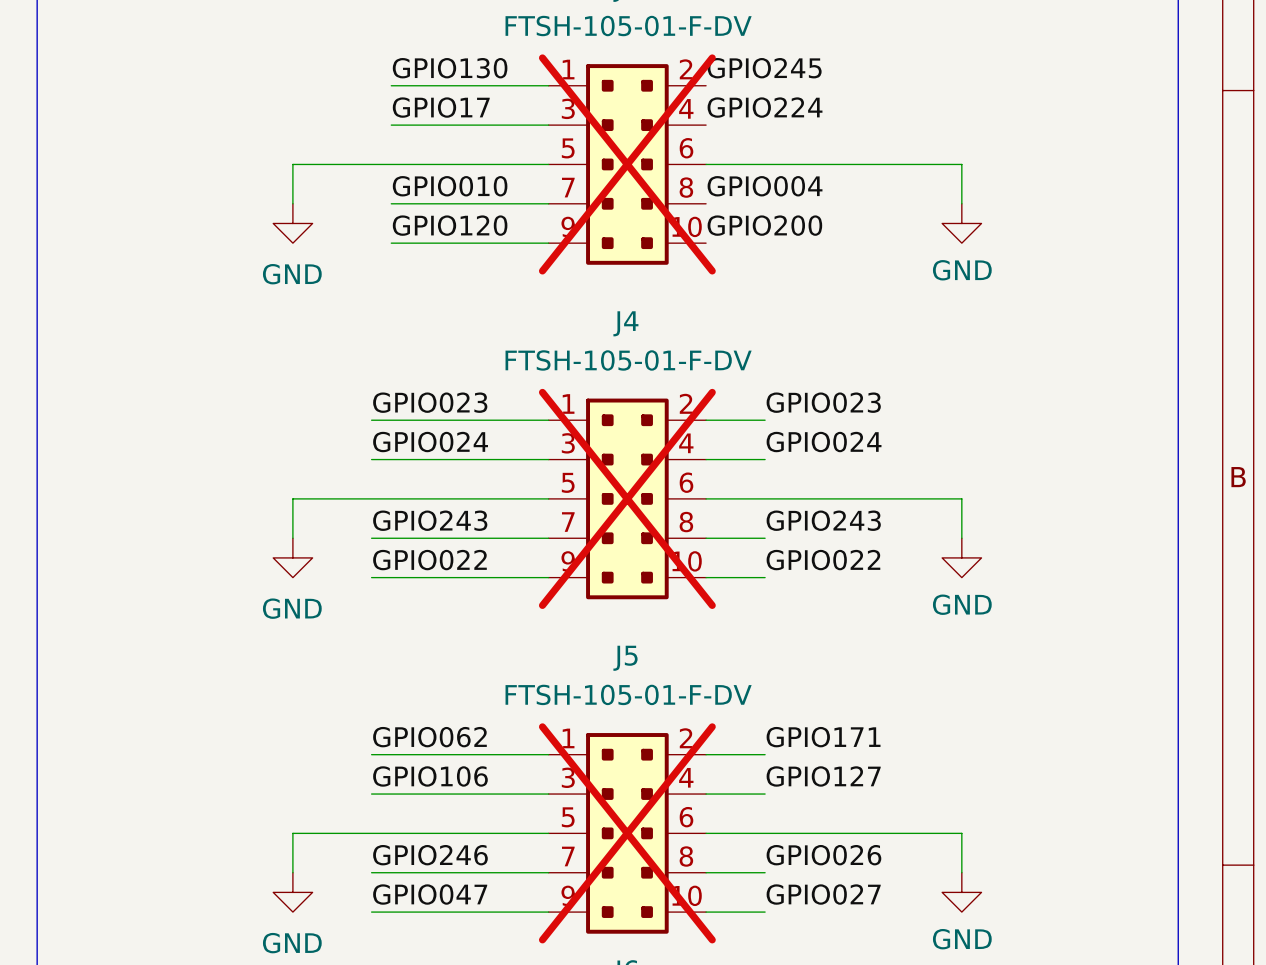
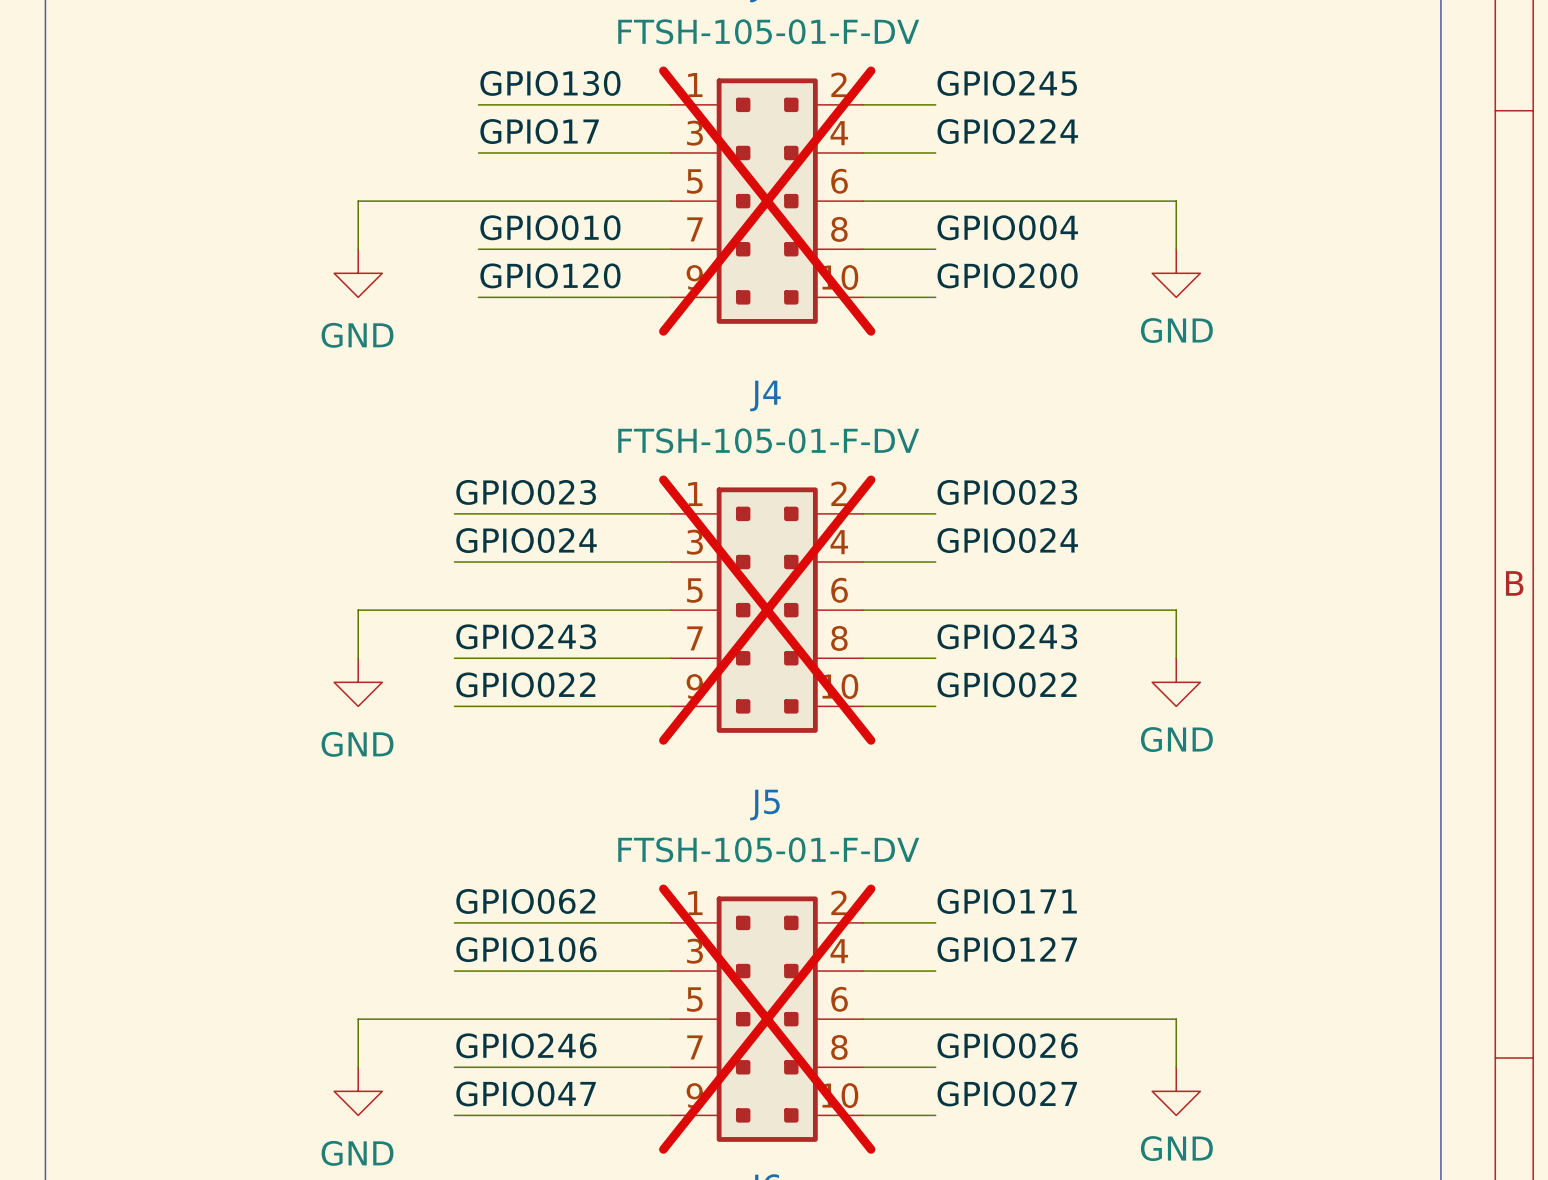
label position: GPIO245 (764, 68) -> GPIO245 (1007, 83)
wire: none -> (863, 104) (935, 104)
label position: GPIO224 (765, 107) -> GPIO224 (1007, 131)
wire: none -> (863, 152) (935, 152)
label position: GPIO004 (765, 186) -> GPIO004 (1007, 227)
wire: none -> (863, 249) (935, 249)
label position: GPIO200 (764, 225) -> GPIO200 (1007, 275)
wire: none -> (863, 297) (935, 297)

